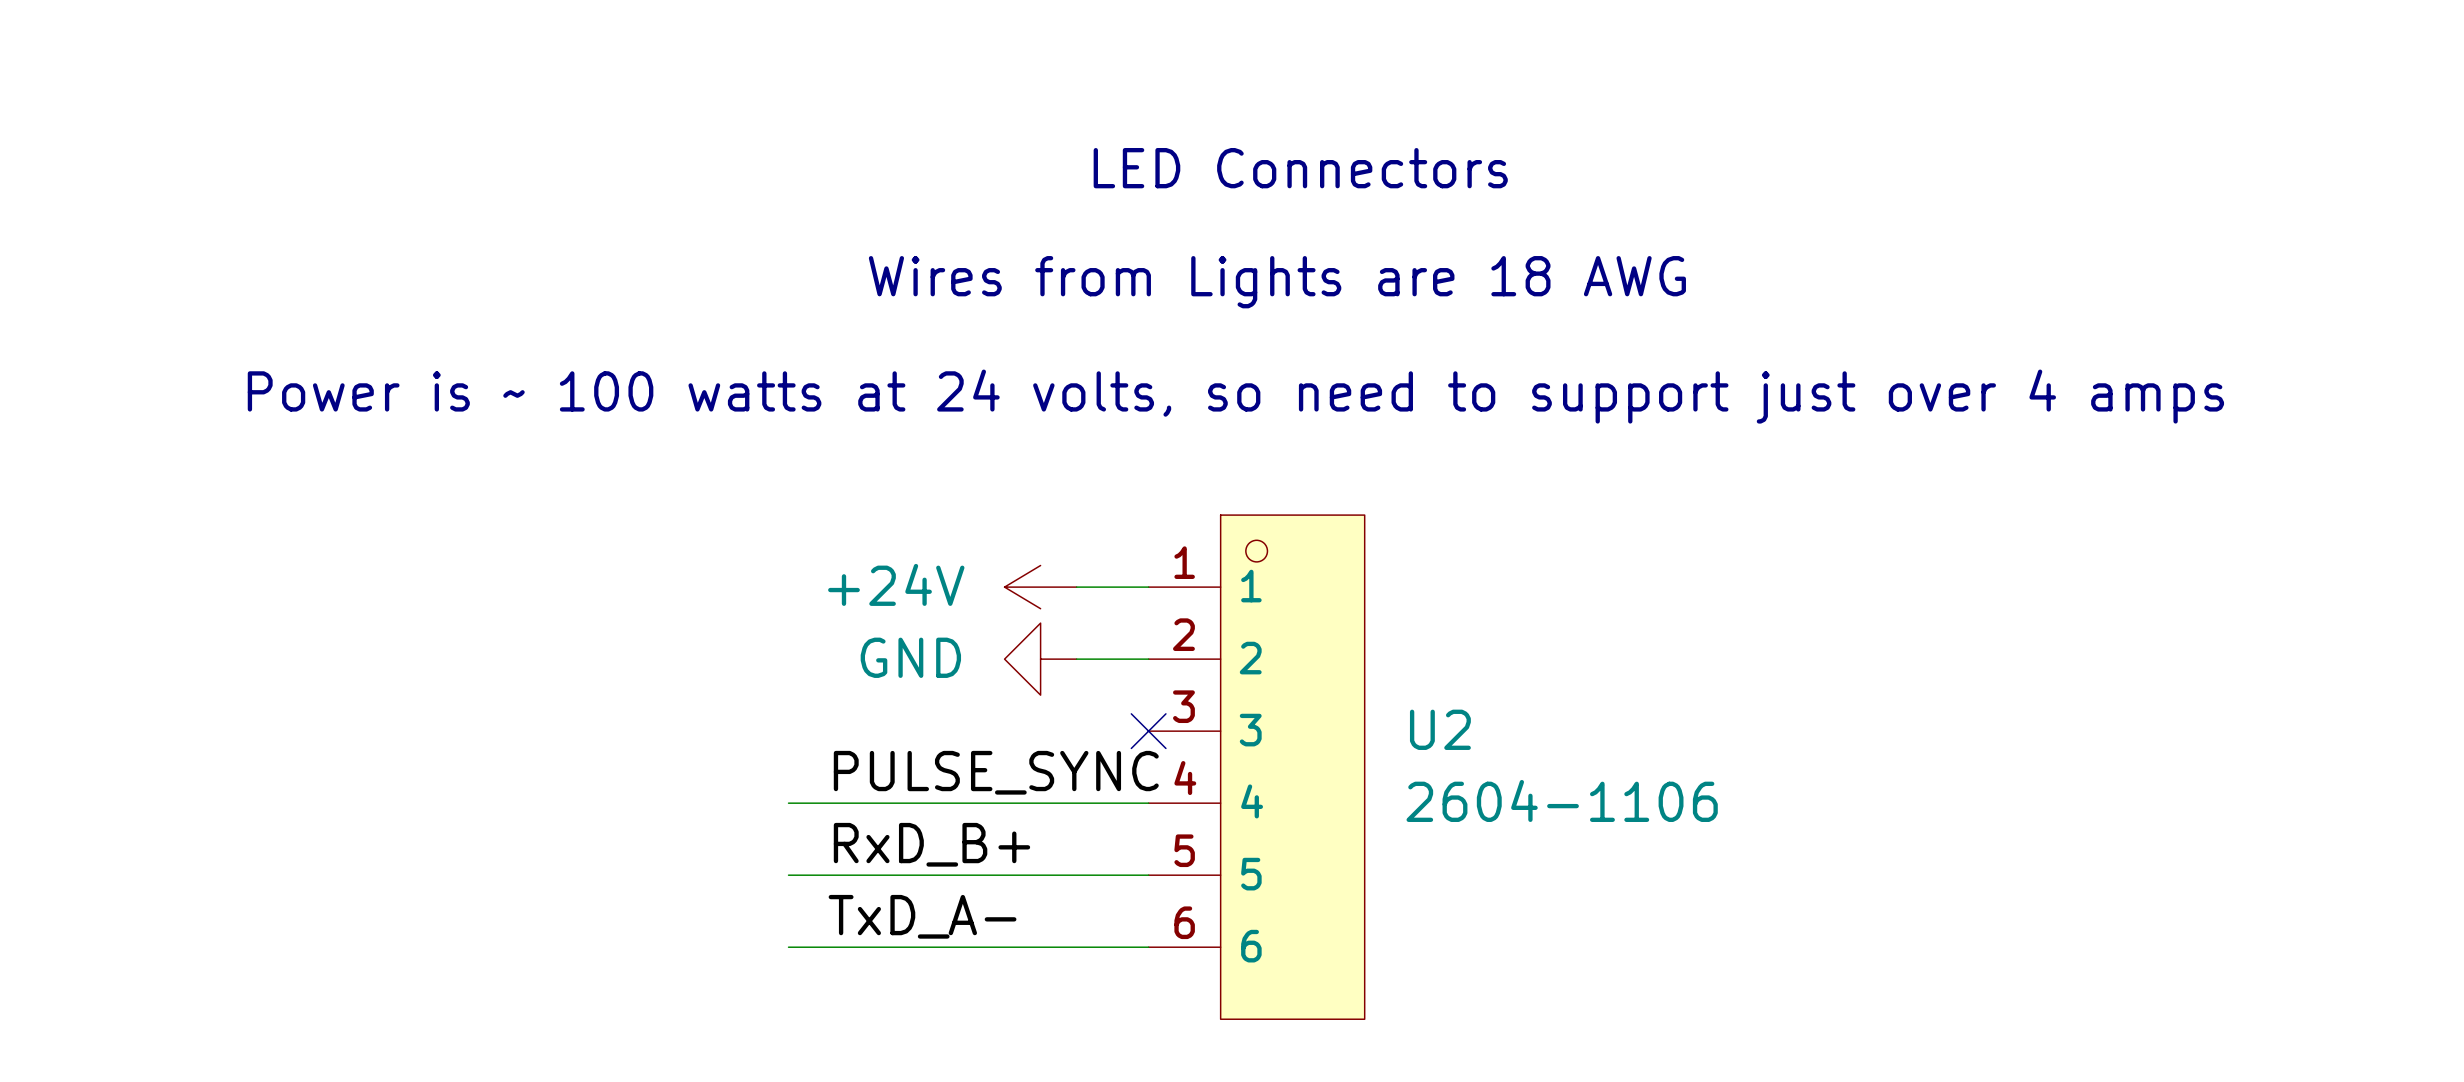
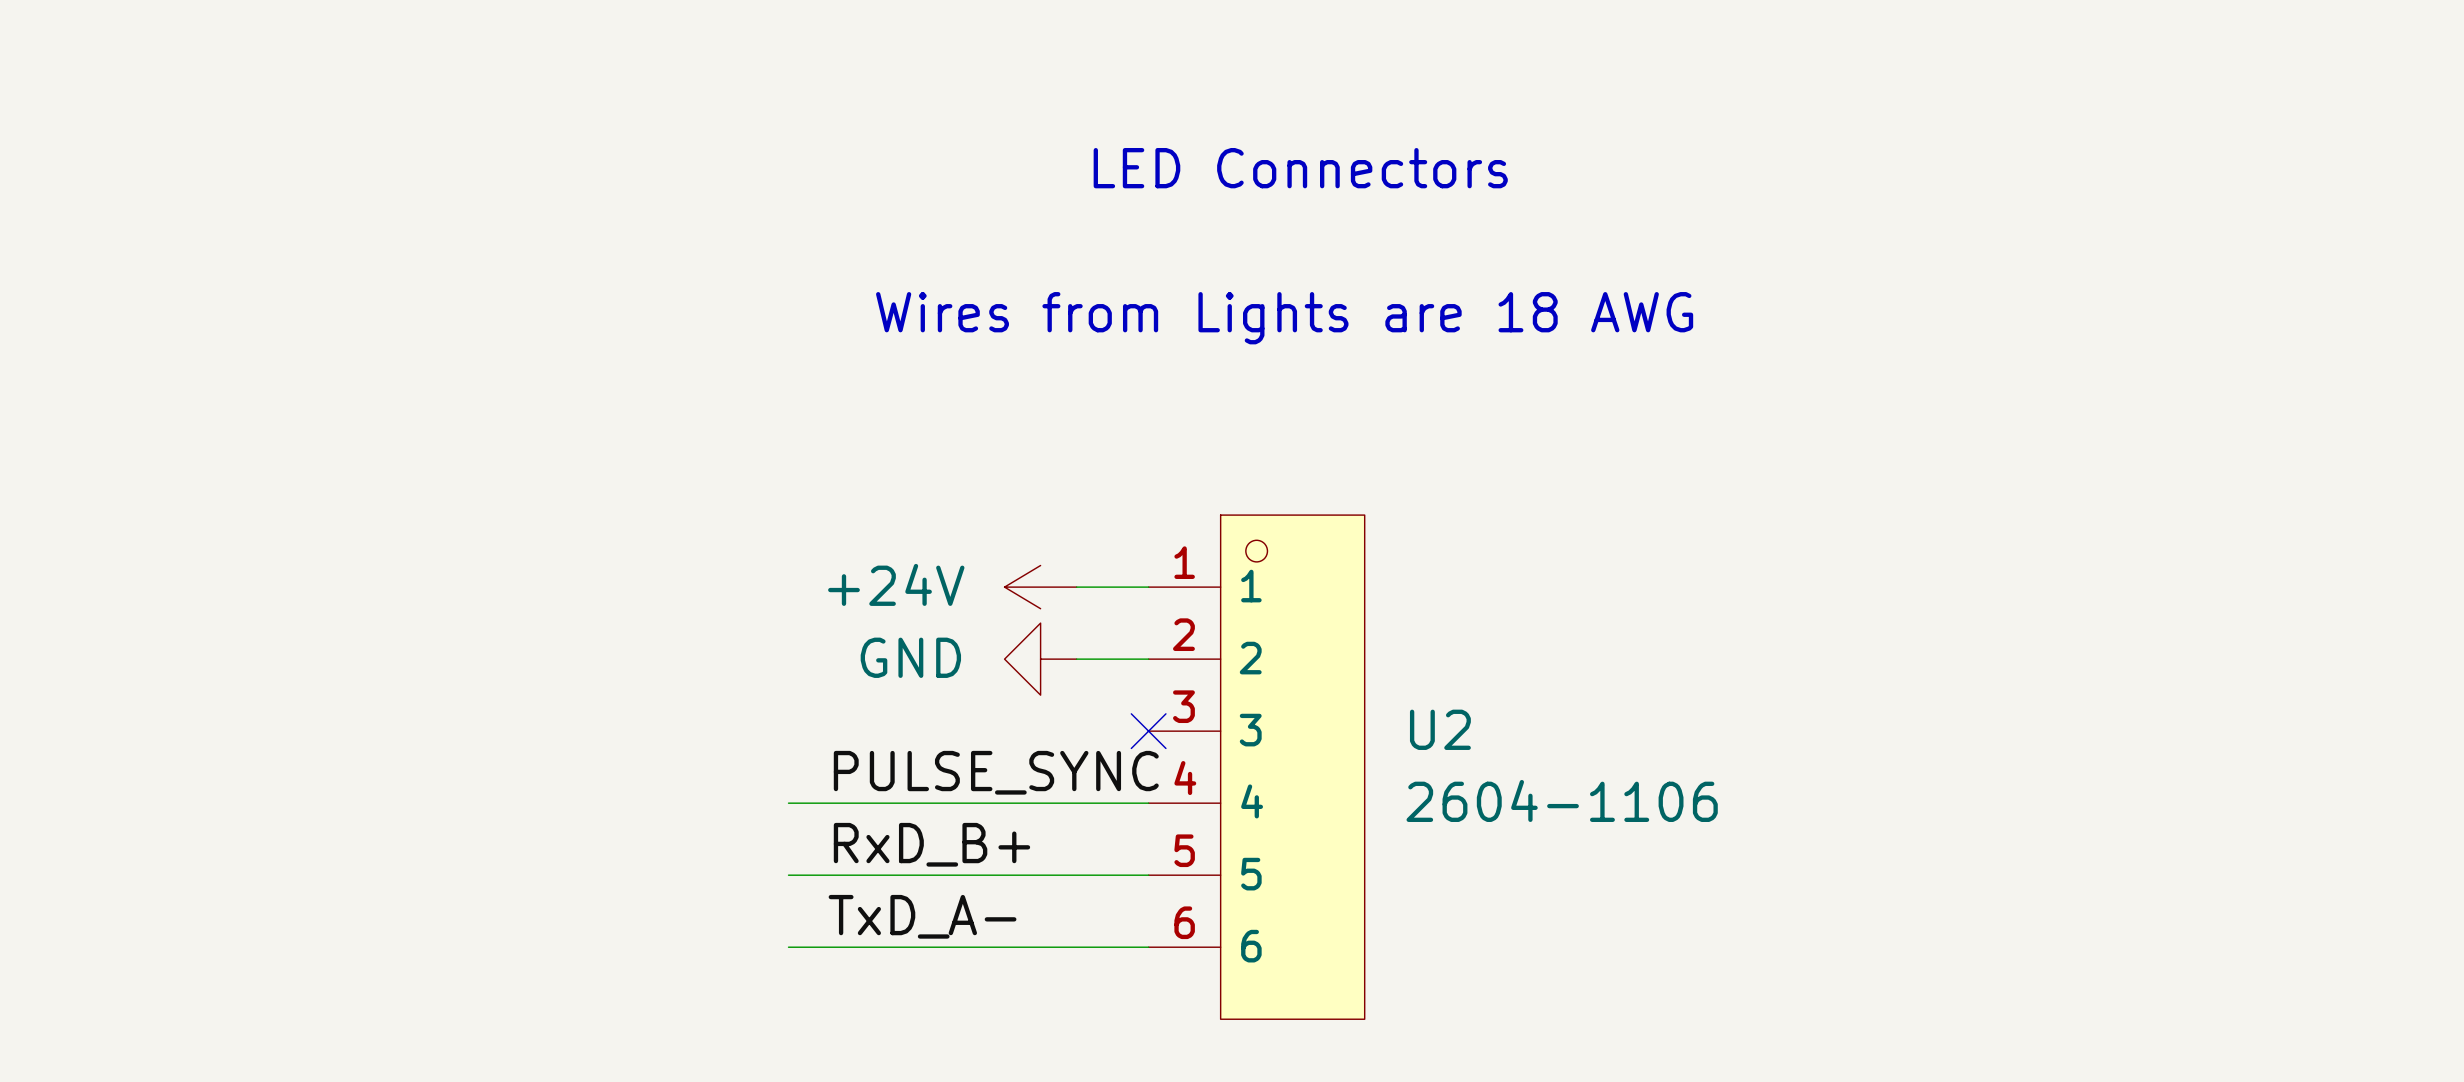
text position: Wires from Lights are 18 AWG (1277, 282) -> Wires from Lights are 18 AWG (1284, 318)
text: Power is ~ 100 watts at 24 volts, so need to support just over 4 amps (1235, 396) -> none

